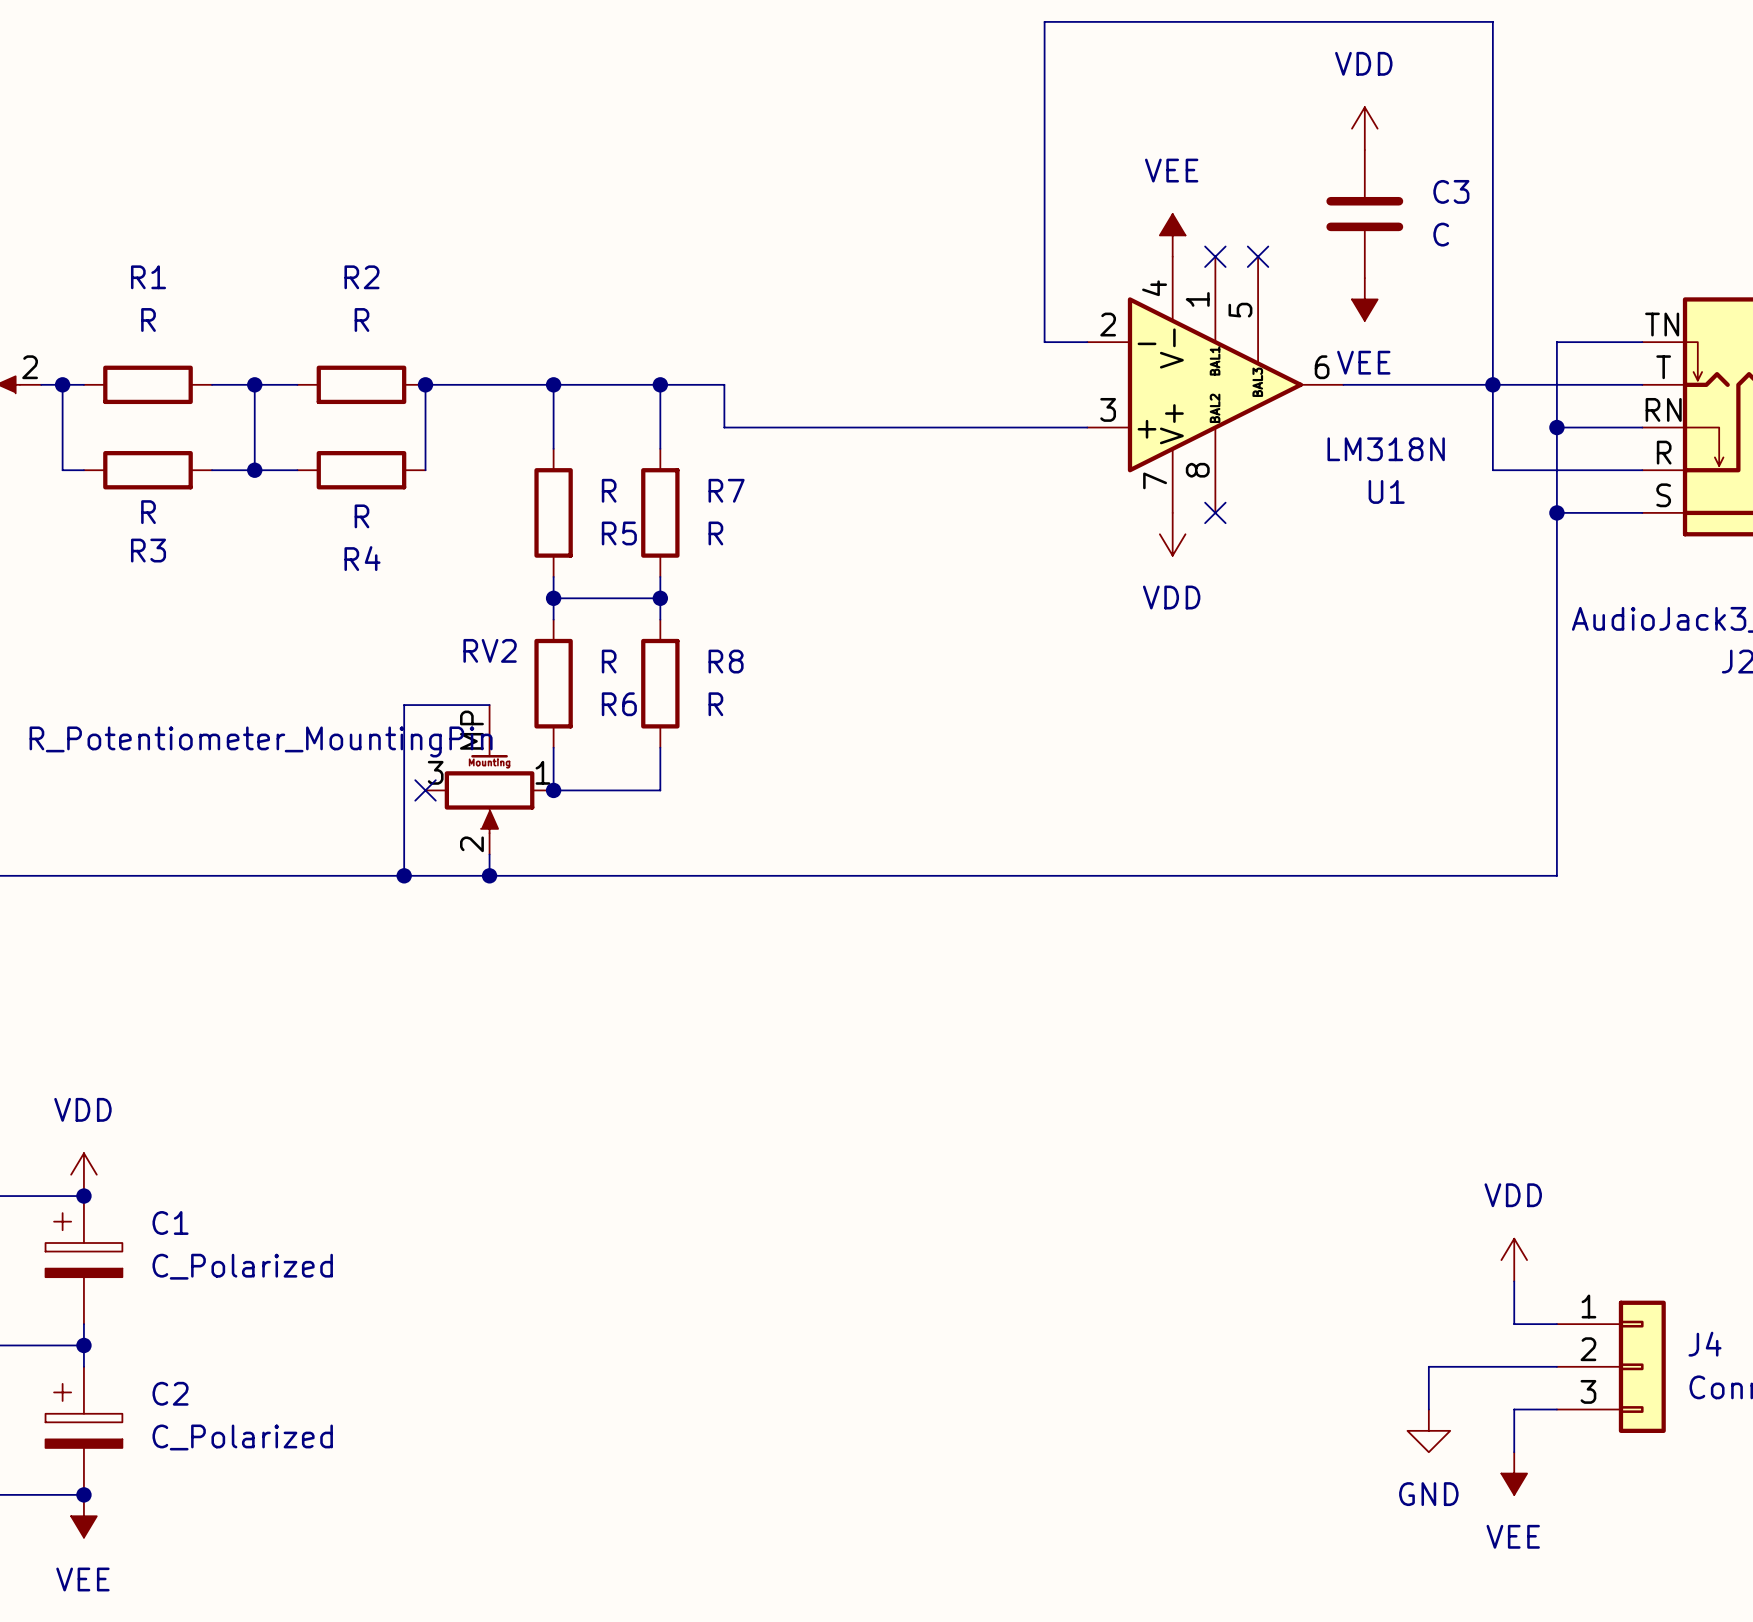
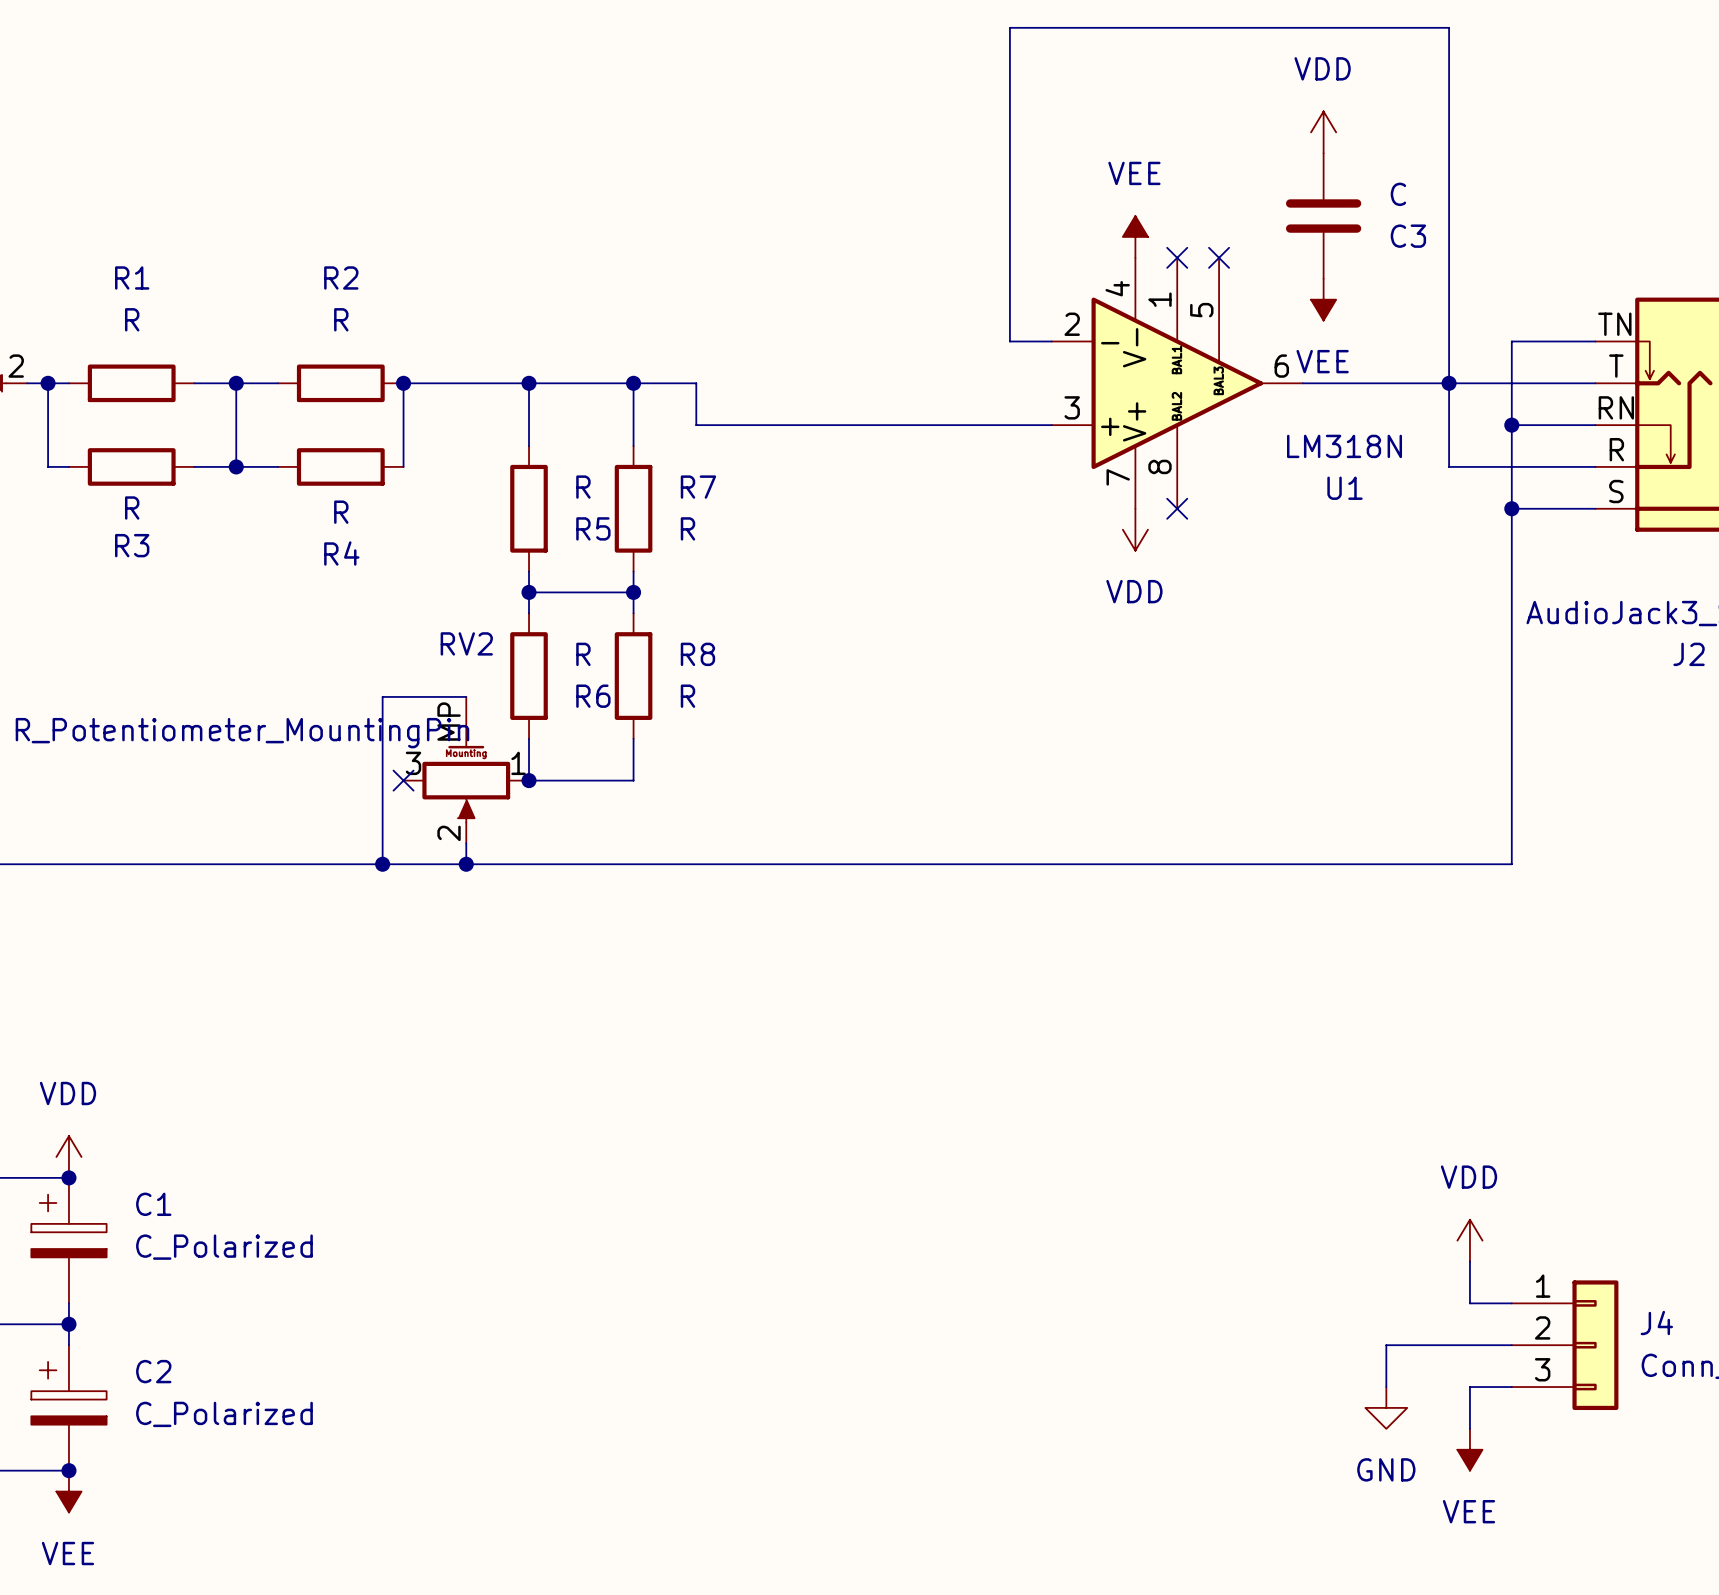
C3 name position: C3 (1451, 191) -> C3 (1408, 236)

